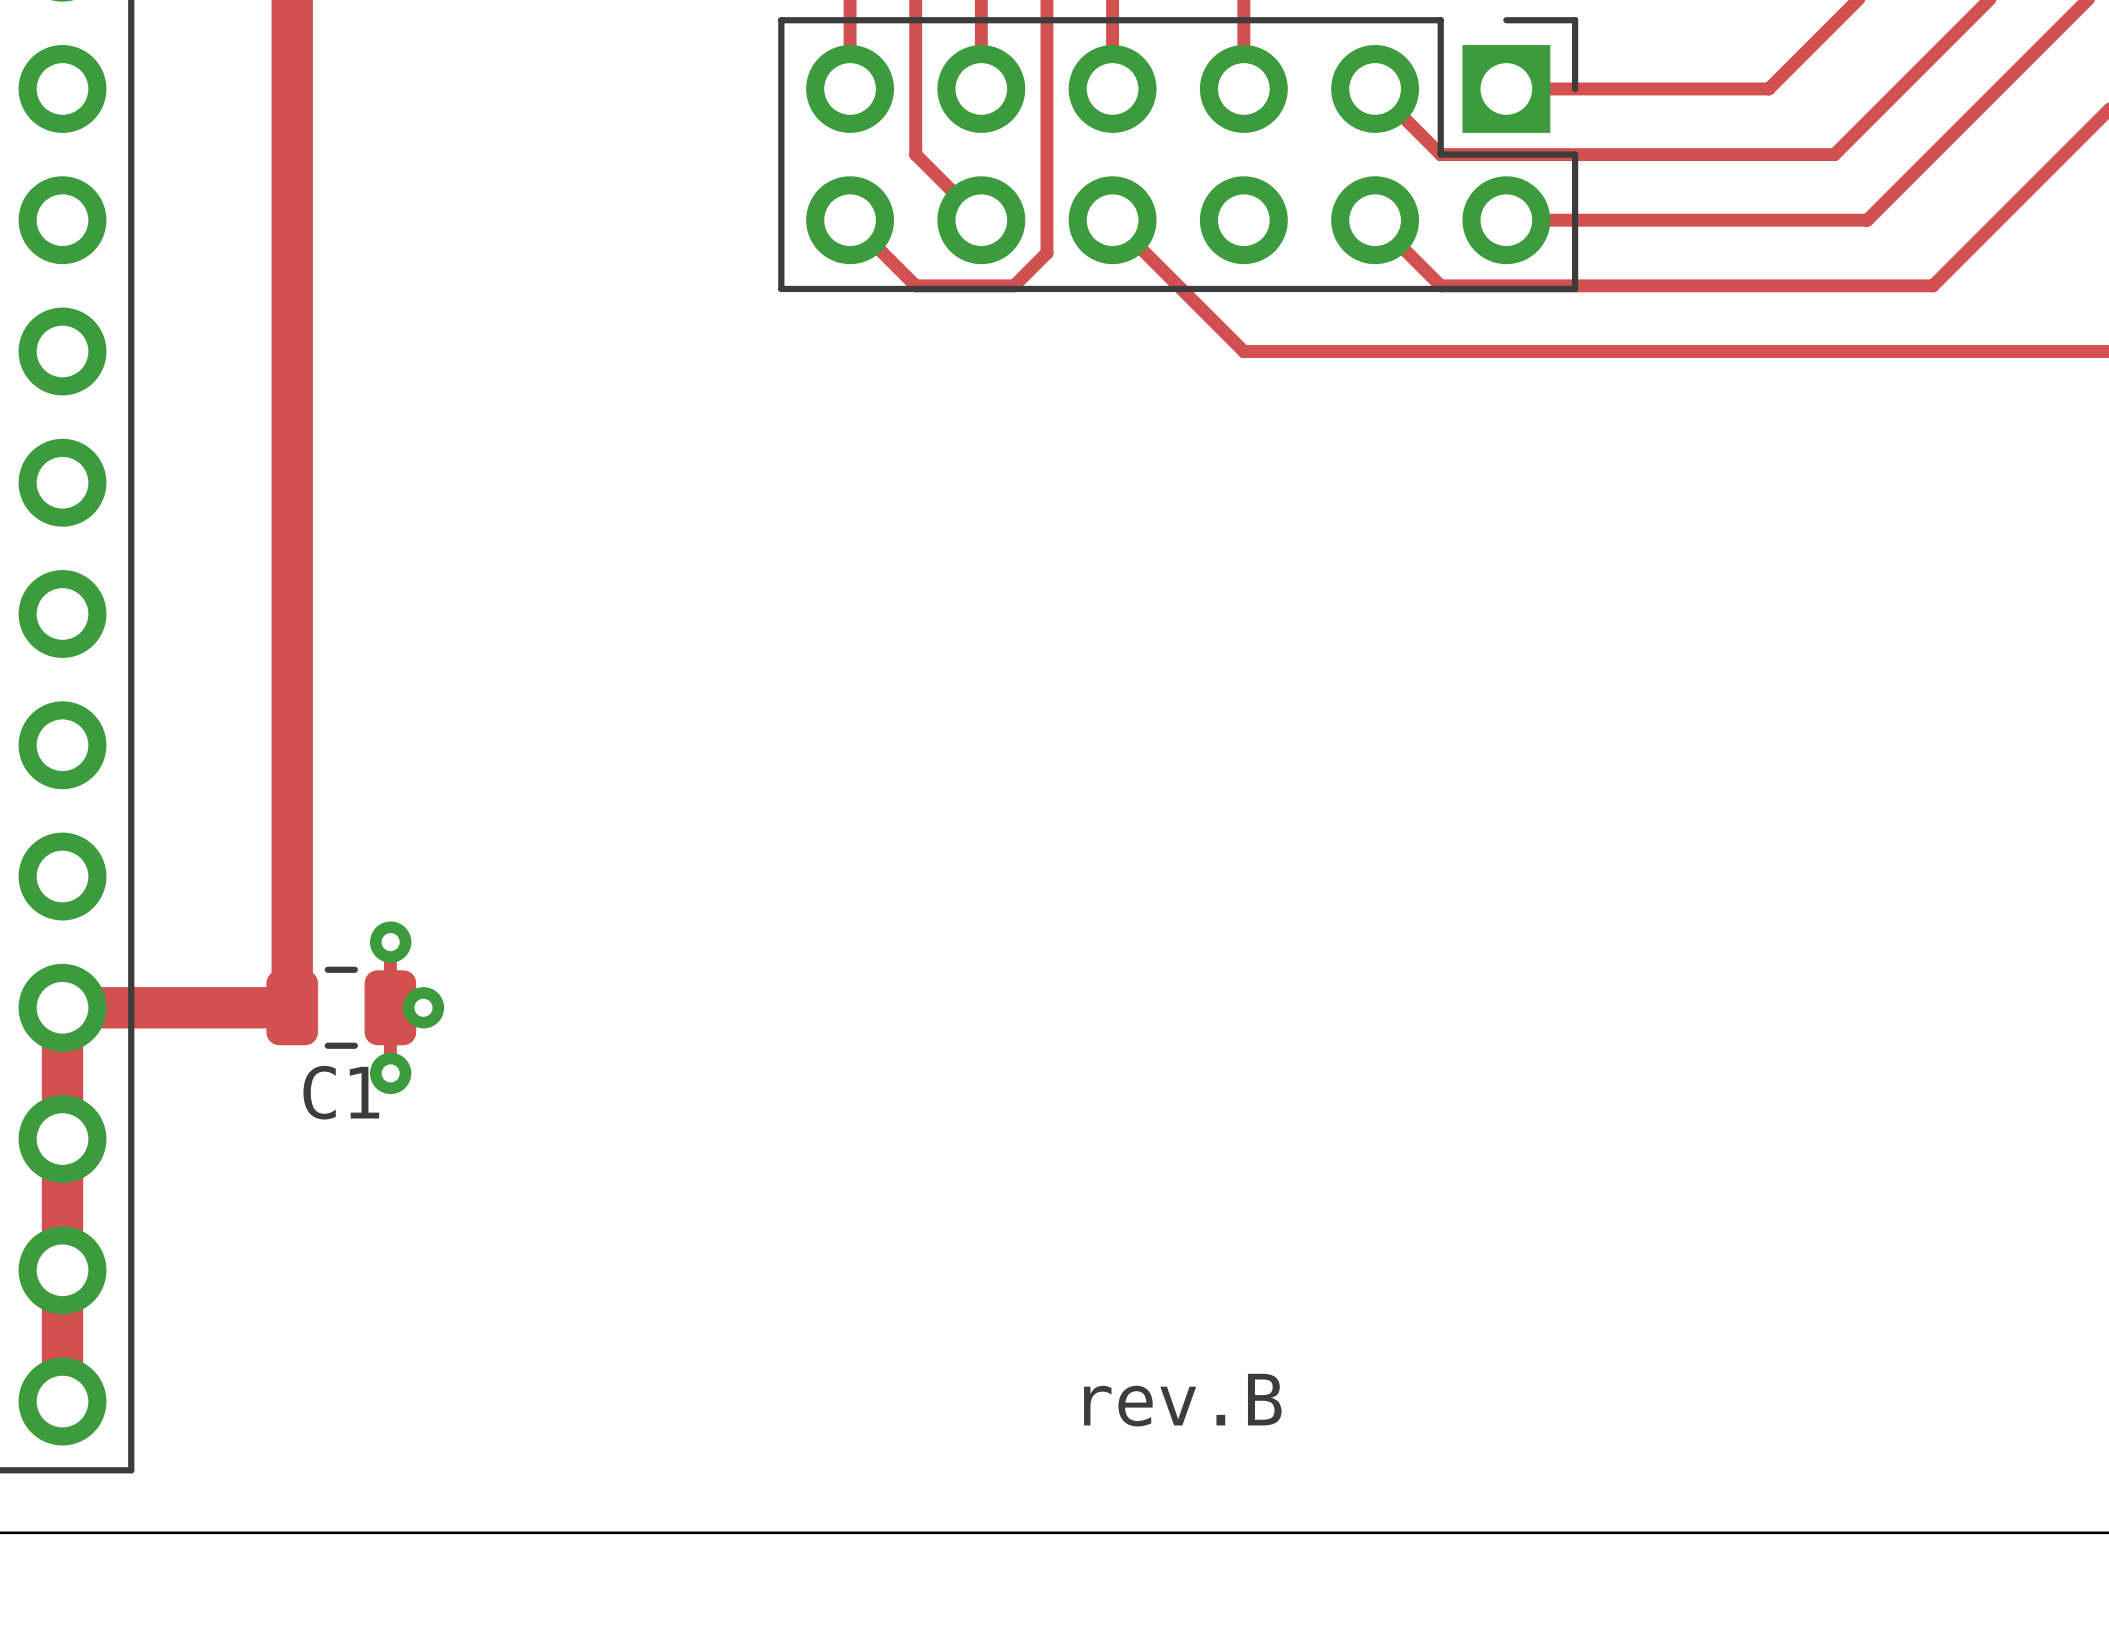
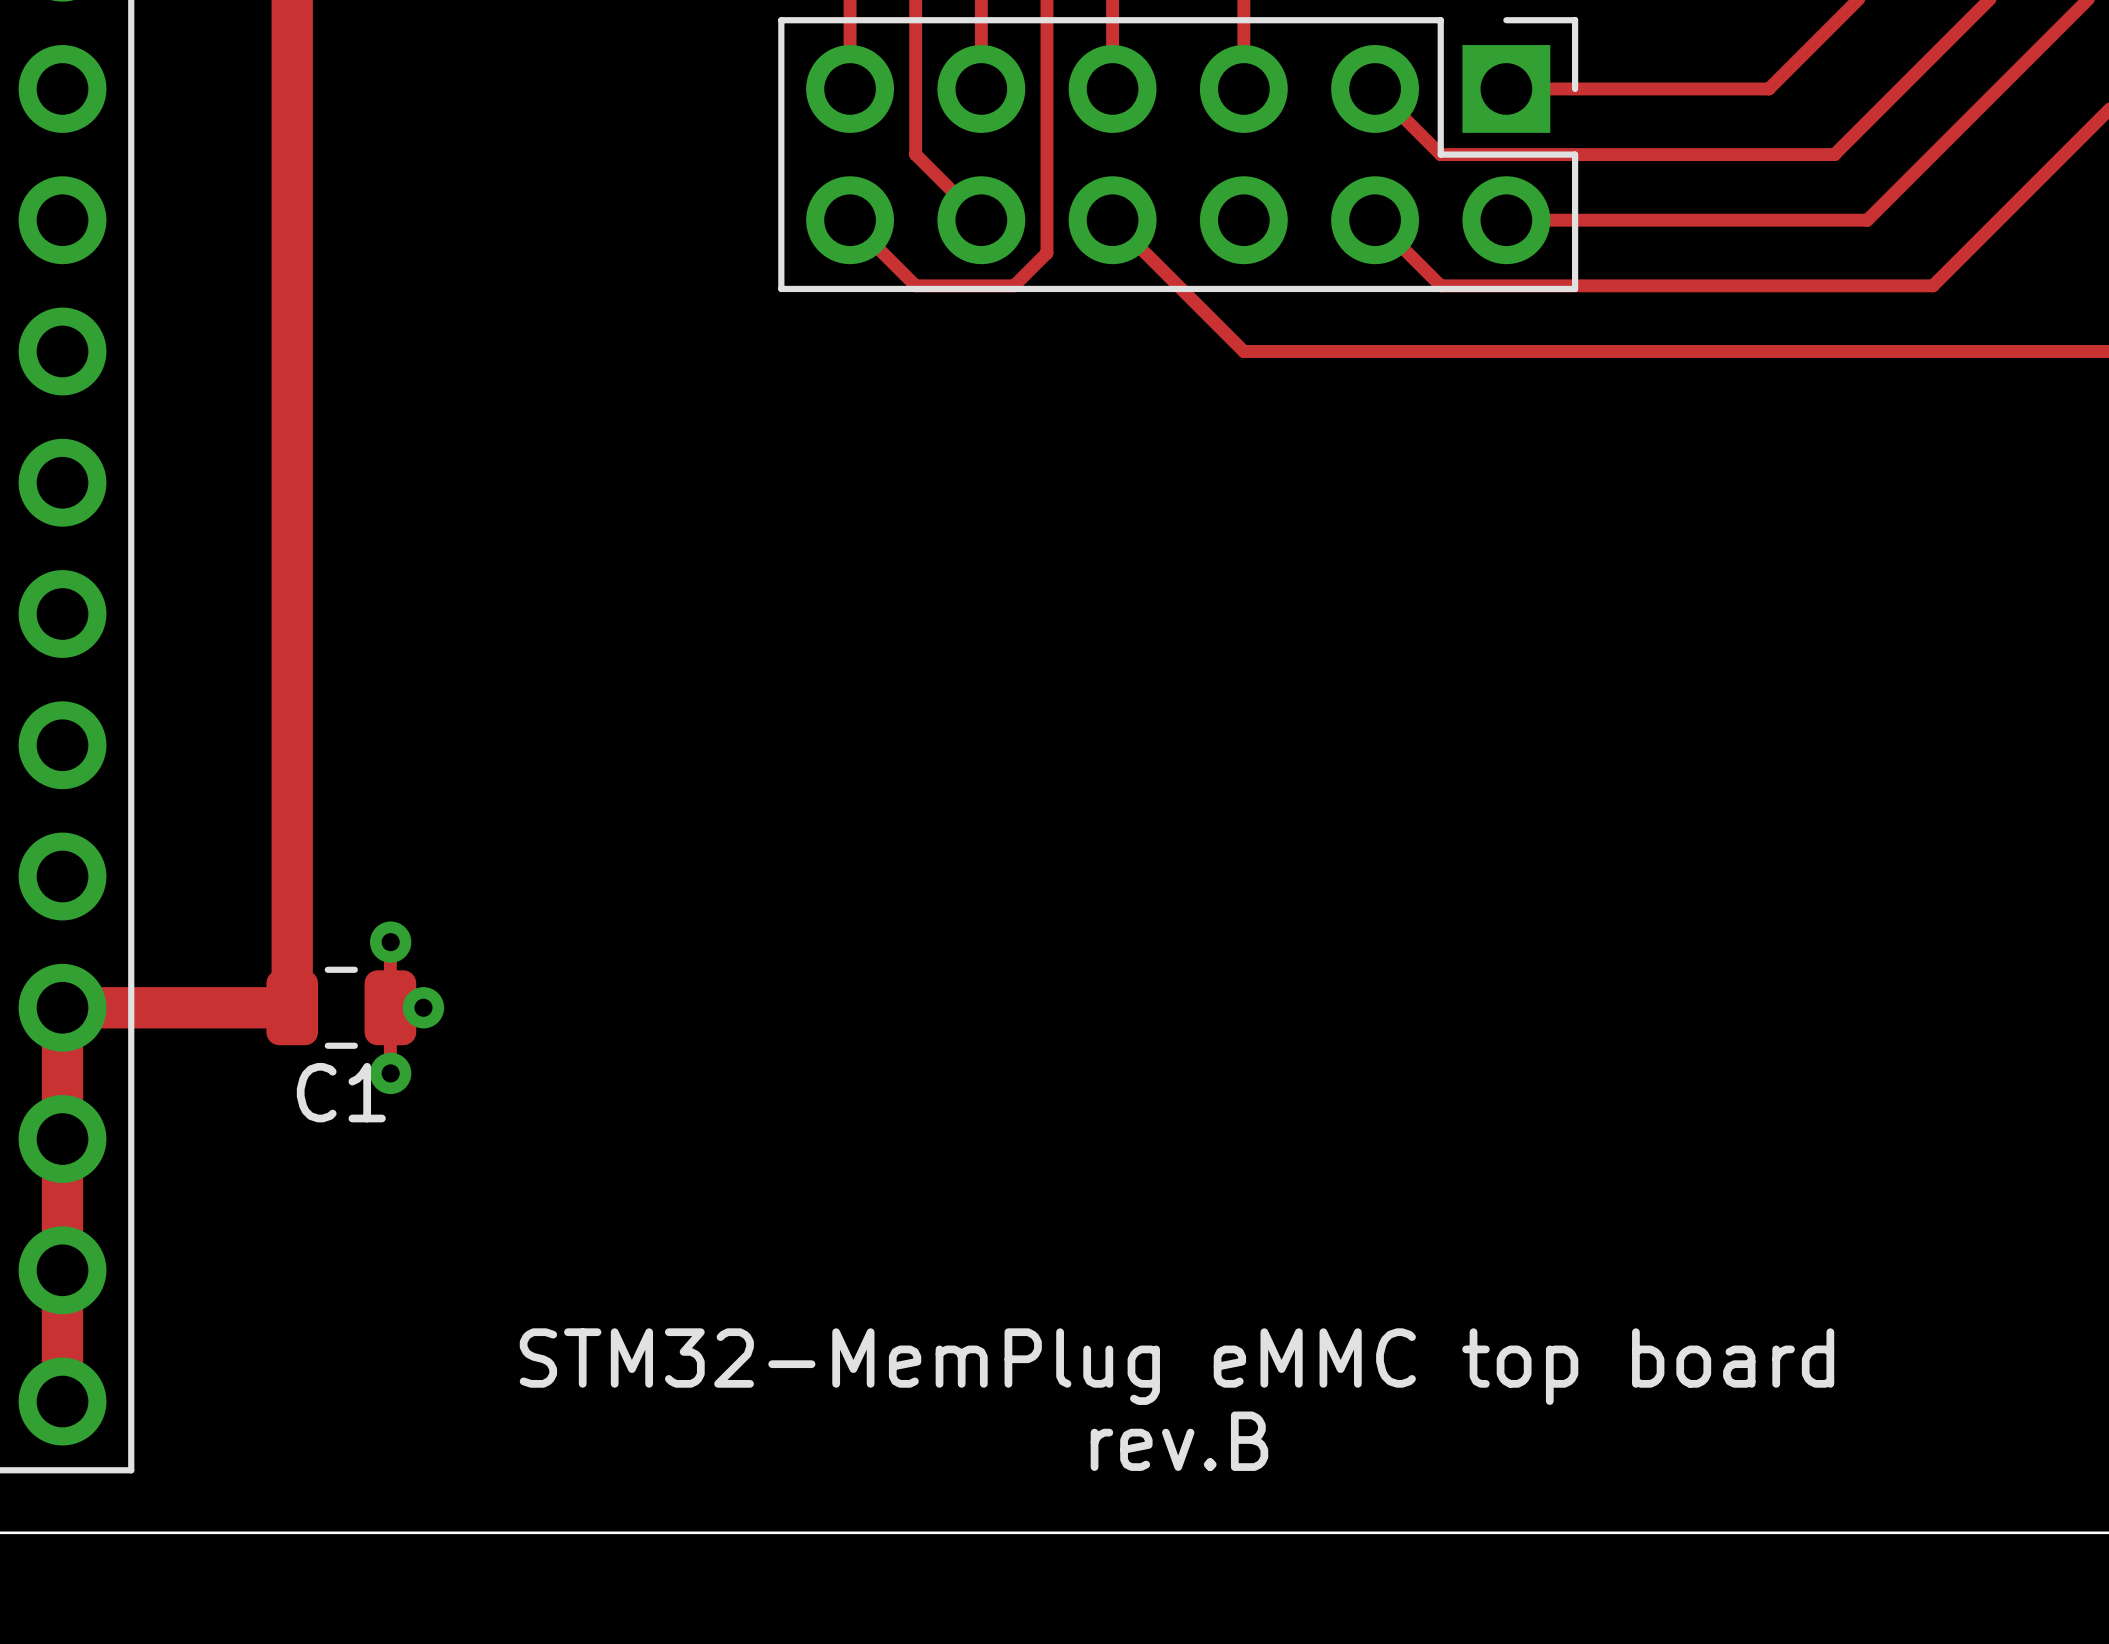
text: none -> STM32-MemPlug eMMC top board (1176, 1366)
text position: rev.B (1182, 1400) -> rev.B (1179, 1441)

